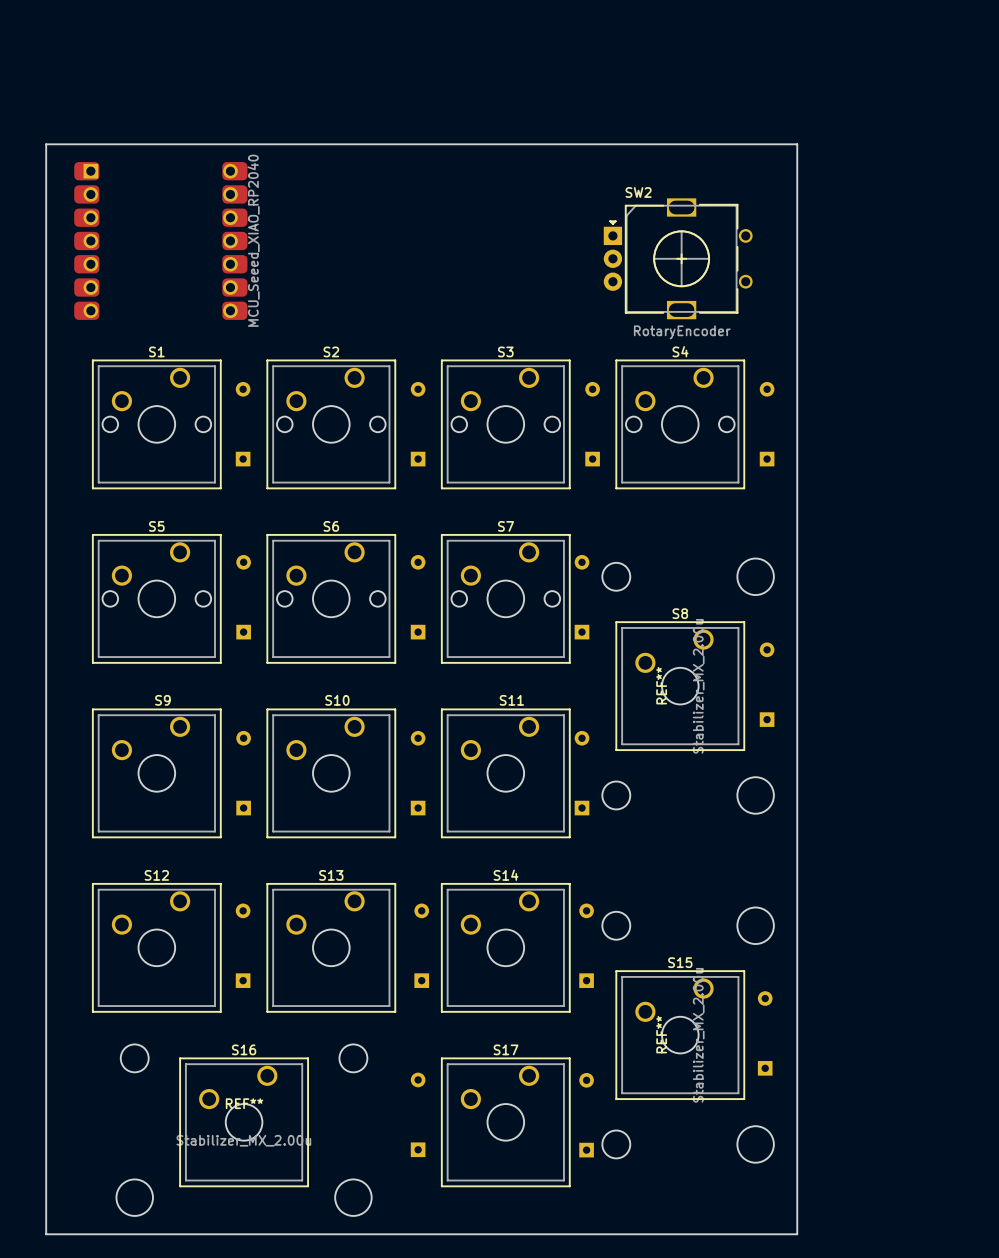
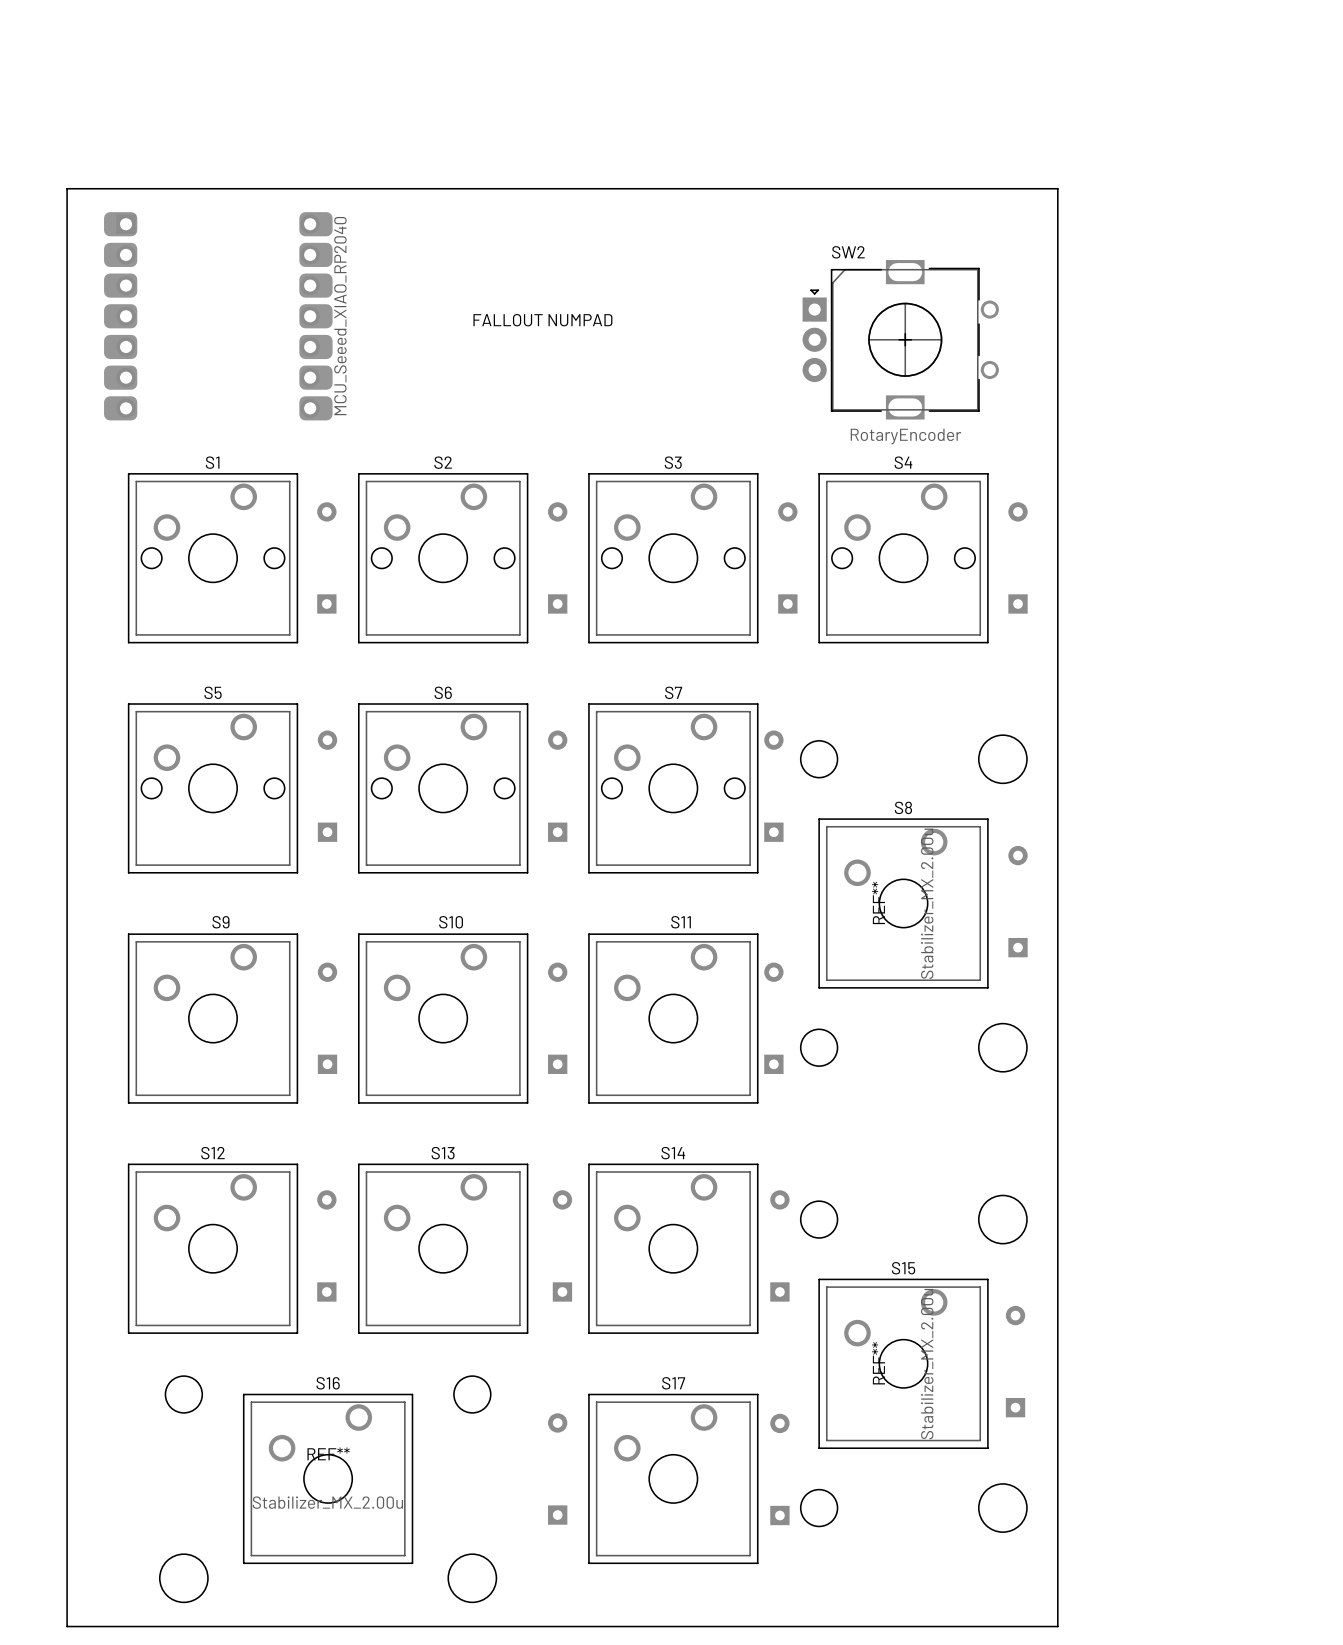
text: none -> FALLOUT NUMPAD (542, 320)

